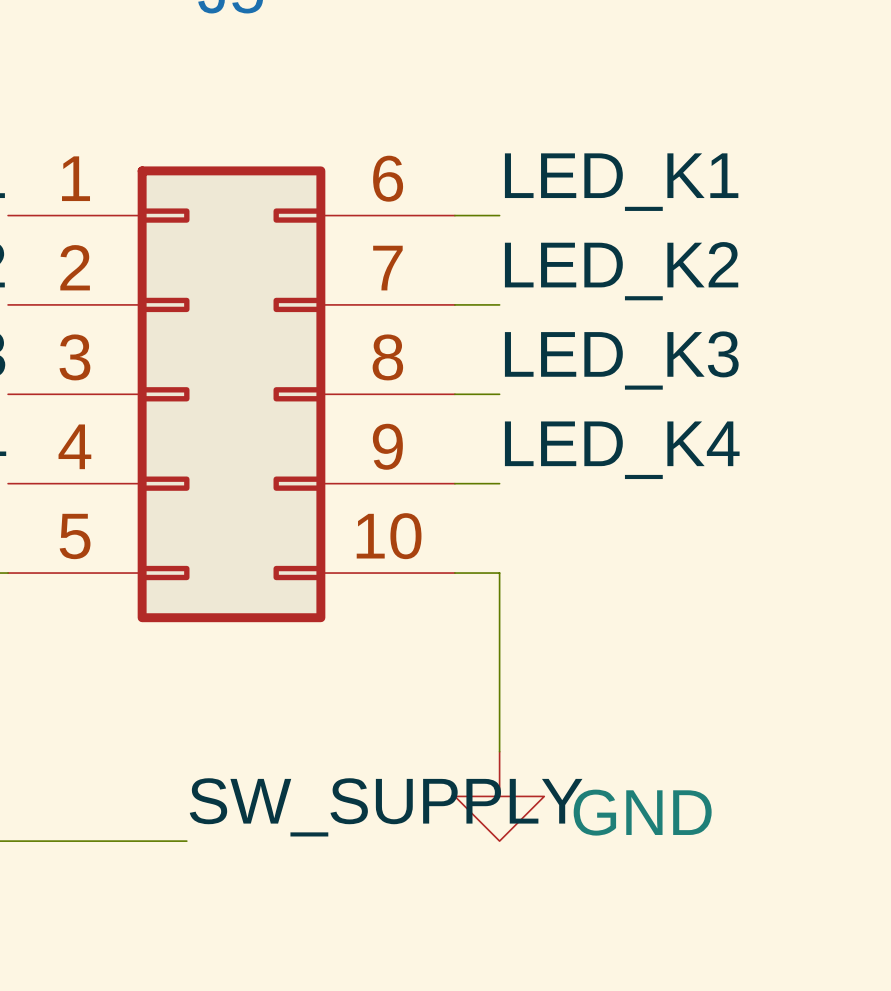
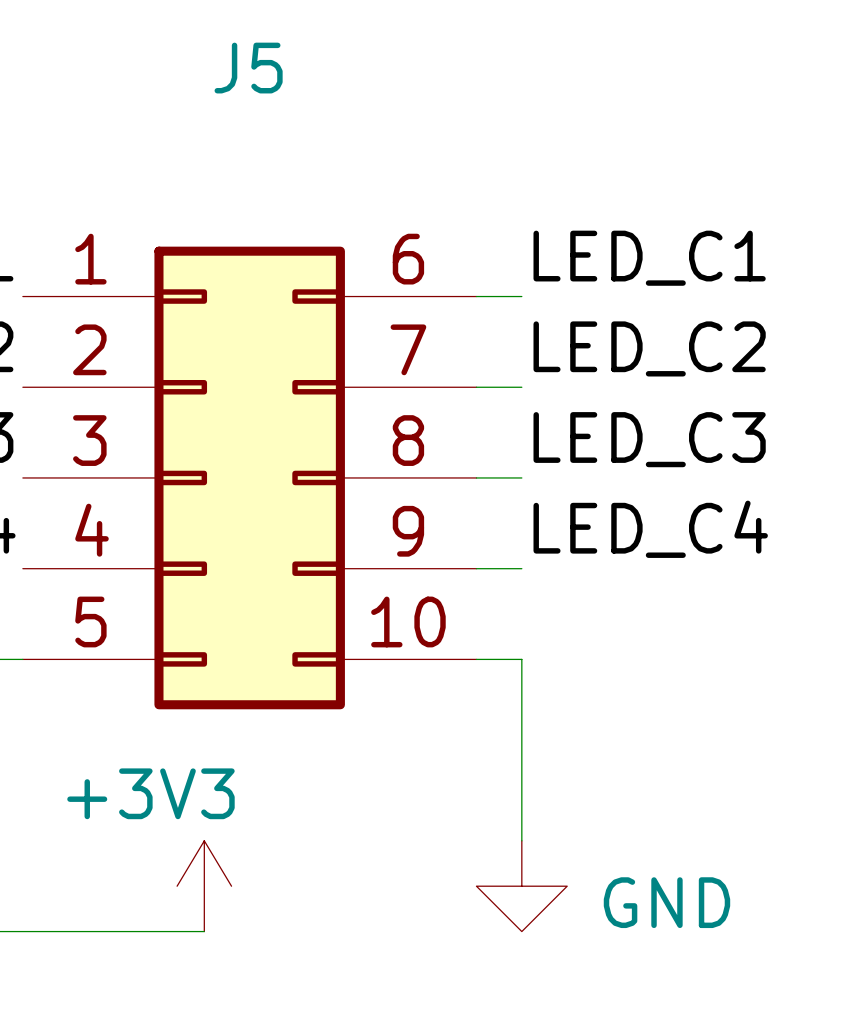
label: LED_K1 (621, 182) -> LED_C1 (649, 258)
label: LED_K2 (621, 271) -> LED_C2 (649, 348)
label: LED_K3 (621, 360) -> LED_C3 (649, 439)
label: LED_K4 (622, 450) -> LED_C4 (650, 529)
power symbol: none -> +3V3 (204, 886)
label: SW_SUPPLY (386, 807) -> none

